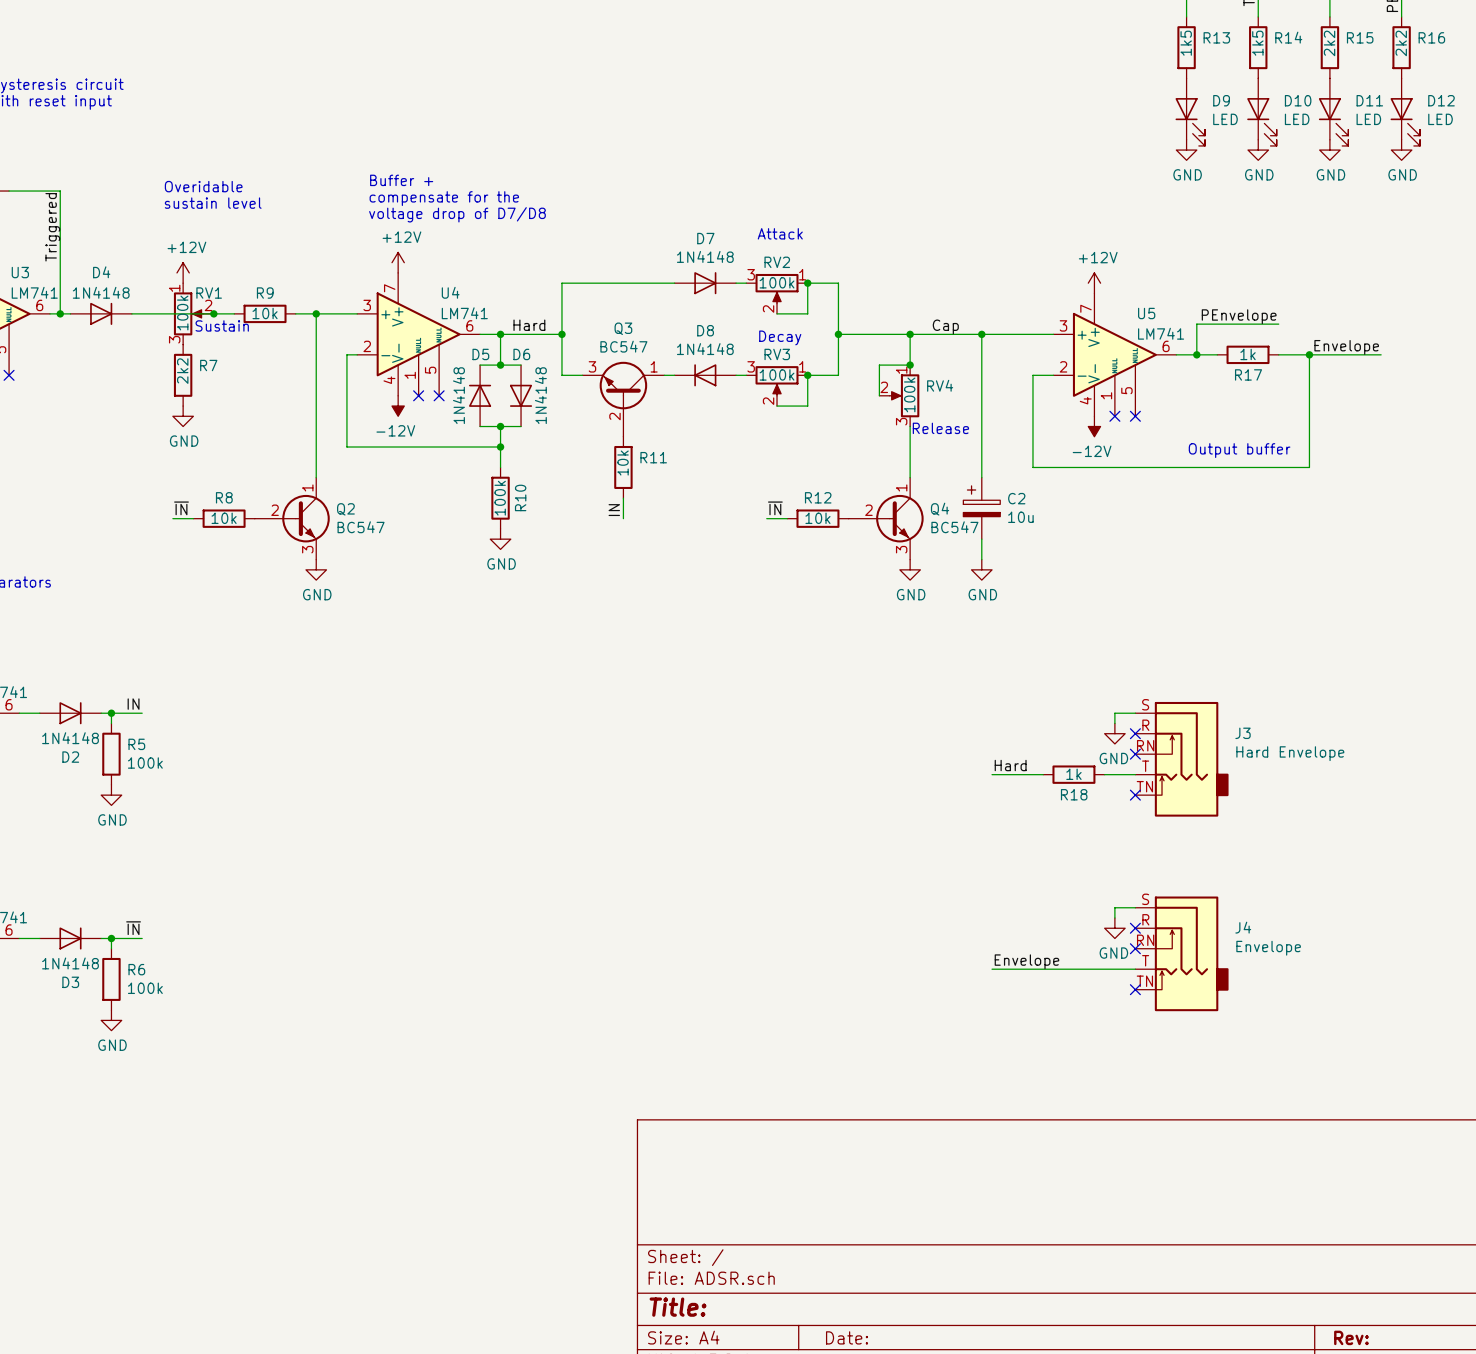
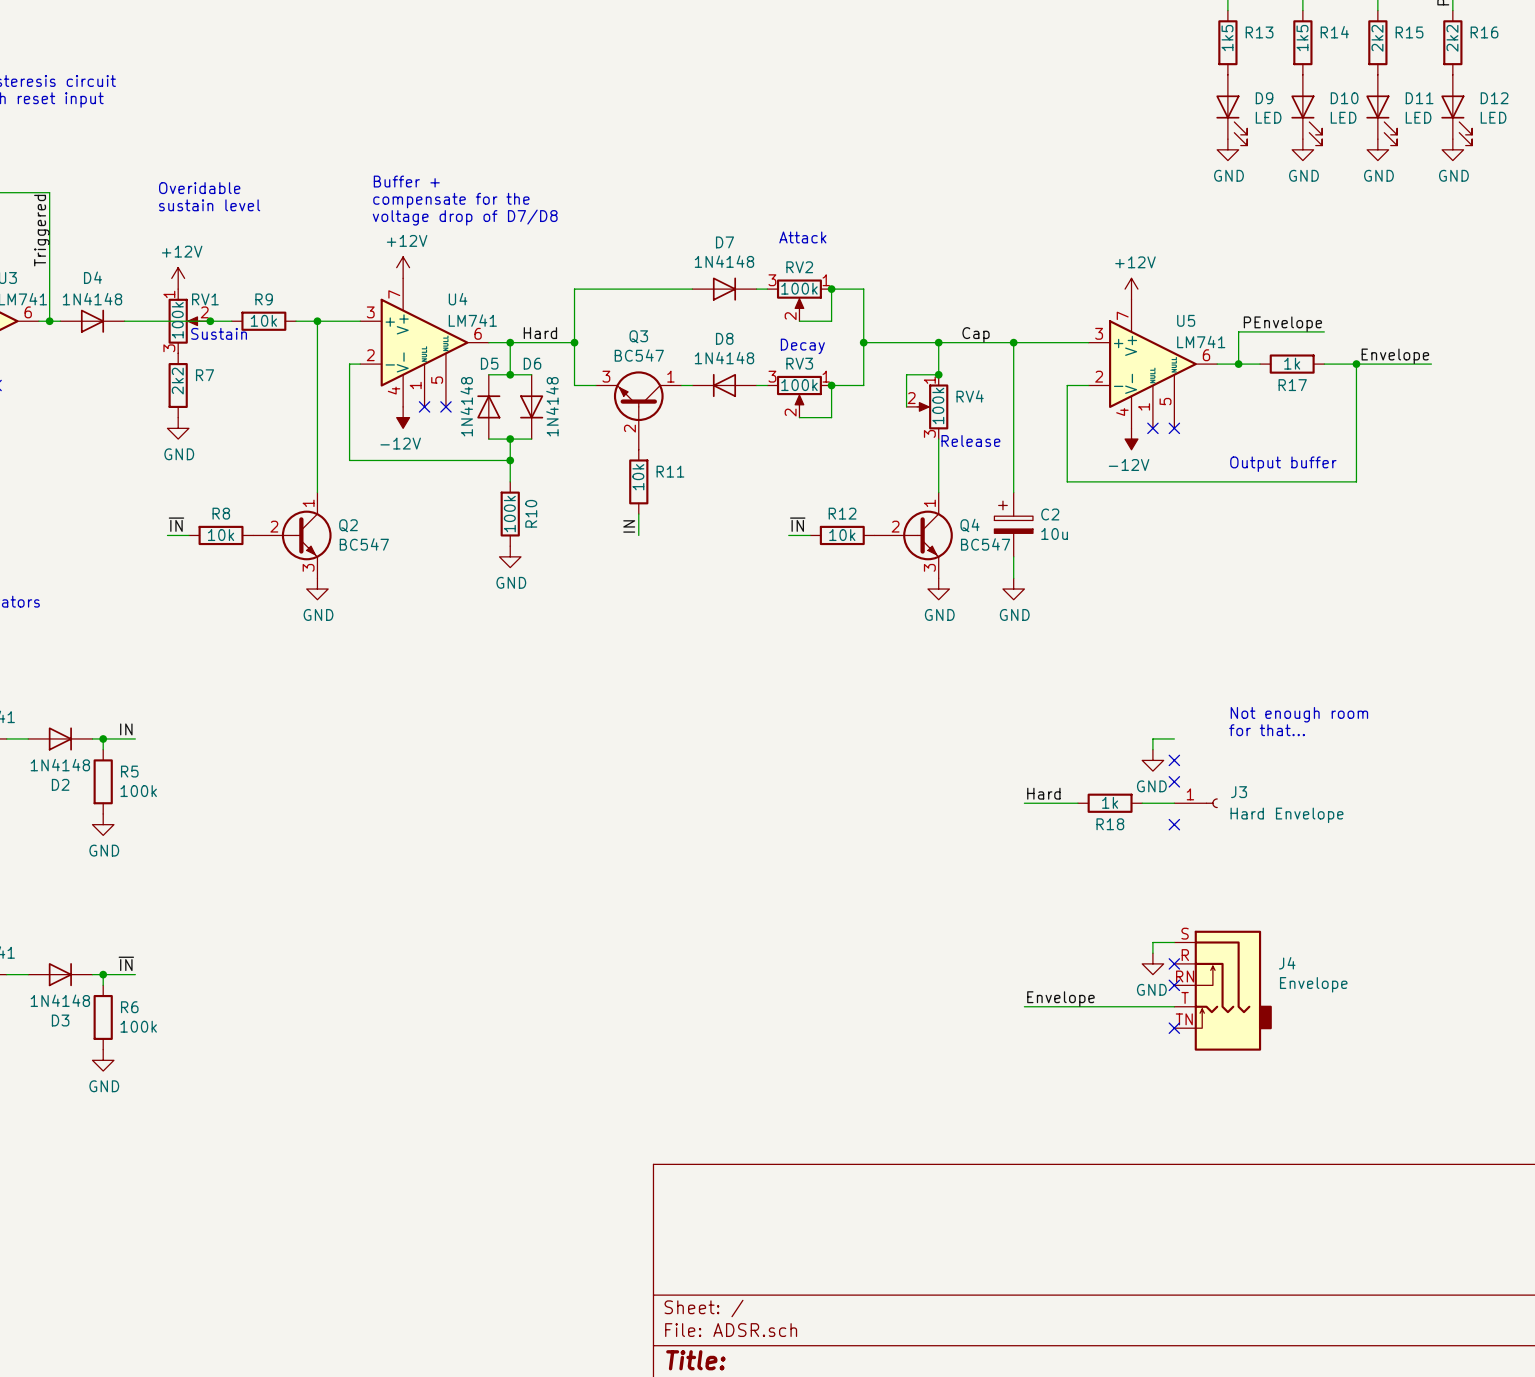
text: none -> Not enough room (1299, 714)
J3 symbol: [1135, 701, 1229, 817] -> [1174, 798, 1218, 809]
text: none -> for that... (1267, 730)
J3 name position: J3 (1243, 733) -> J3 (1239, 792)
J3 value position: Hard Envelope (1290, 753) -> Hard Envelope (1287, 815)

